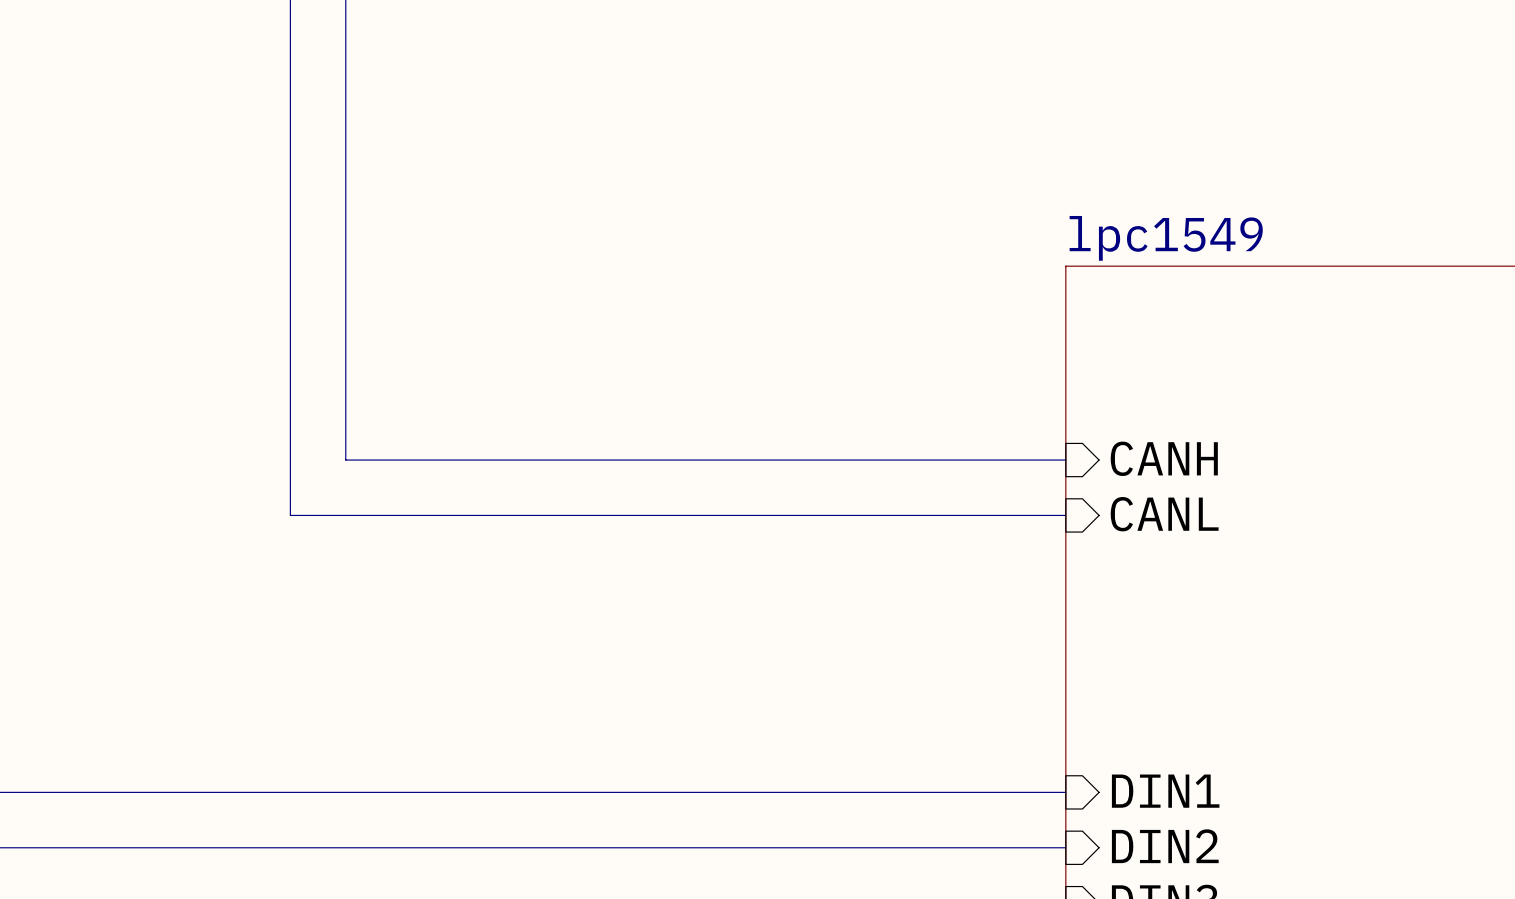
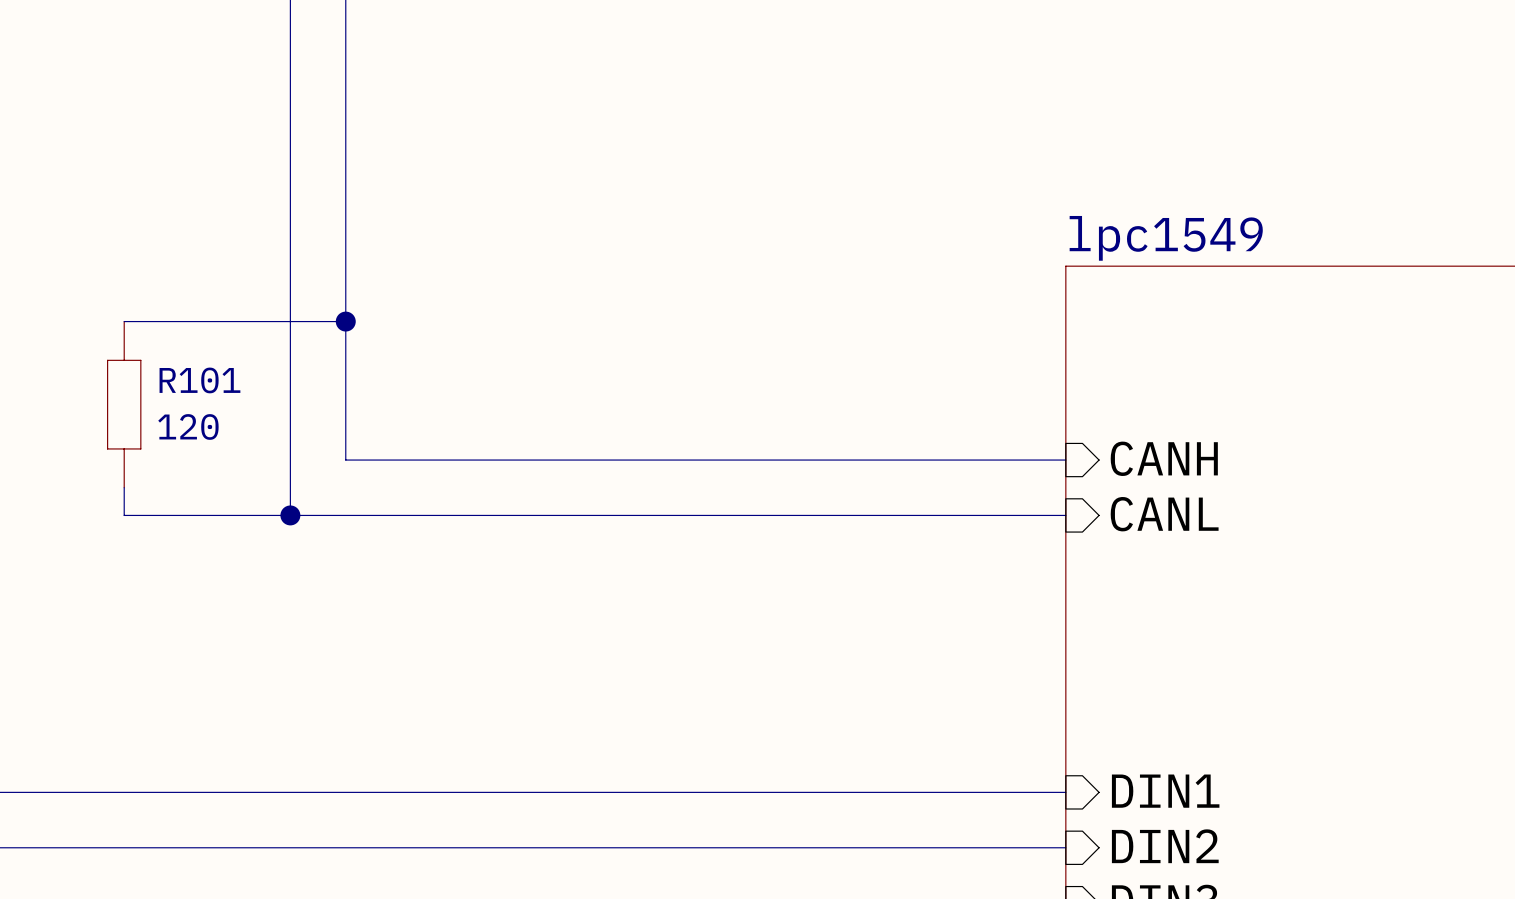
wire: none -> (124, 321) (345, 321)
junction: none -> (345, 321)
R101: none -> 120 (124, 404)
wire: none -> (124, 487) (124, 515) (290, 515)
junction: none -> (290, 515)

